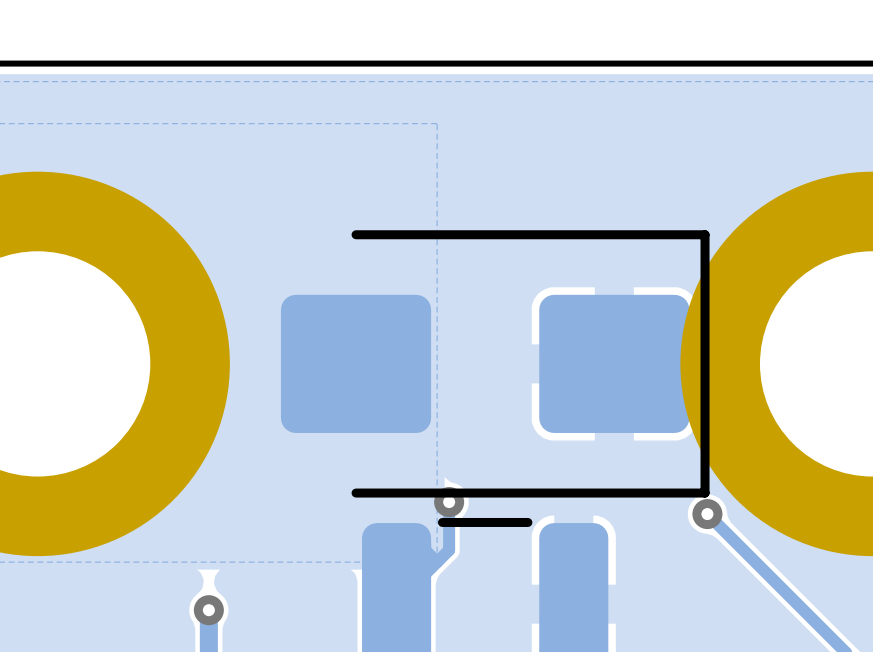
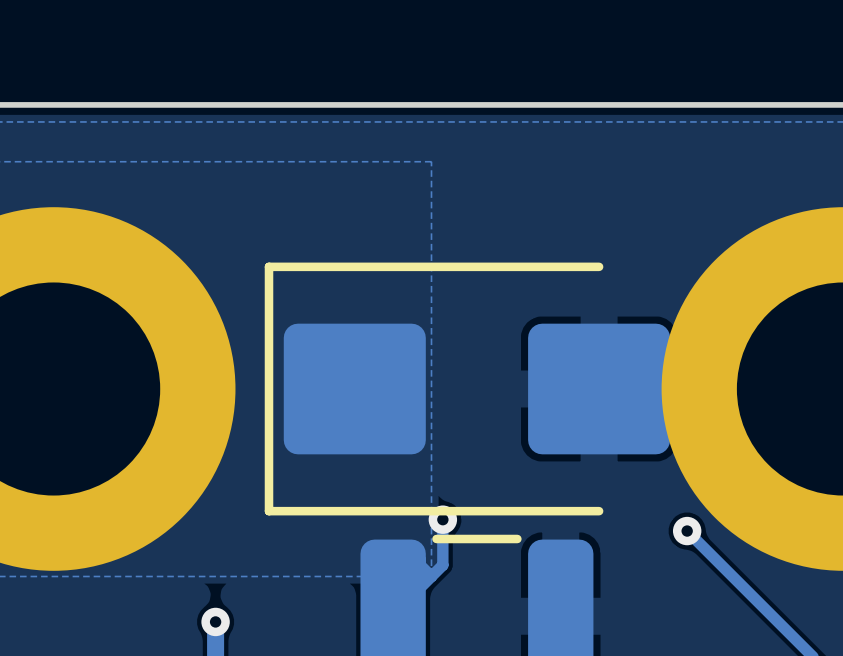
part rotation: 0° (495, 363) -> 180° (467, 389)

